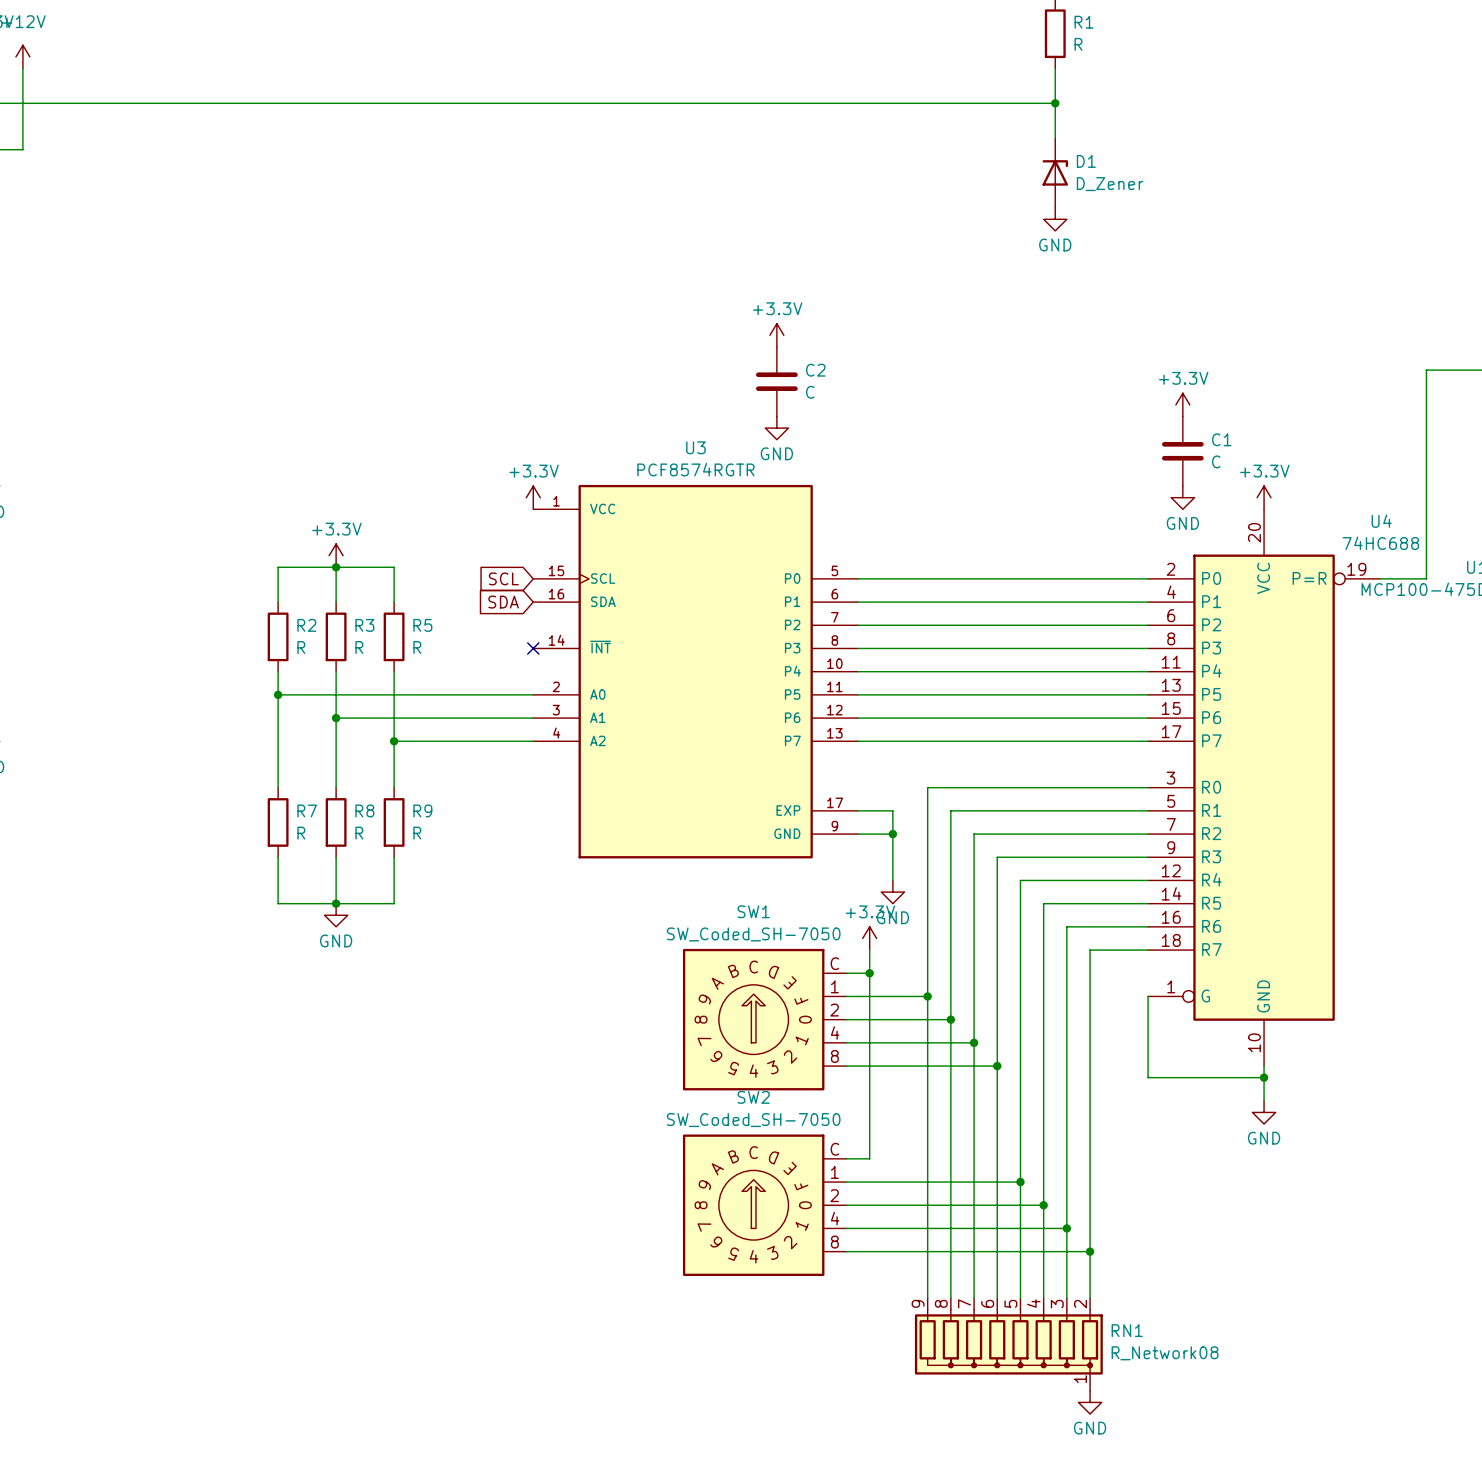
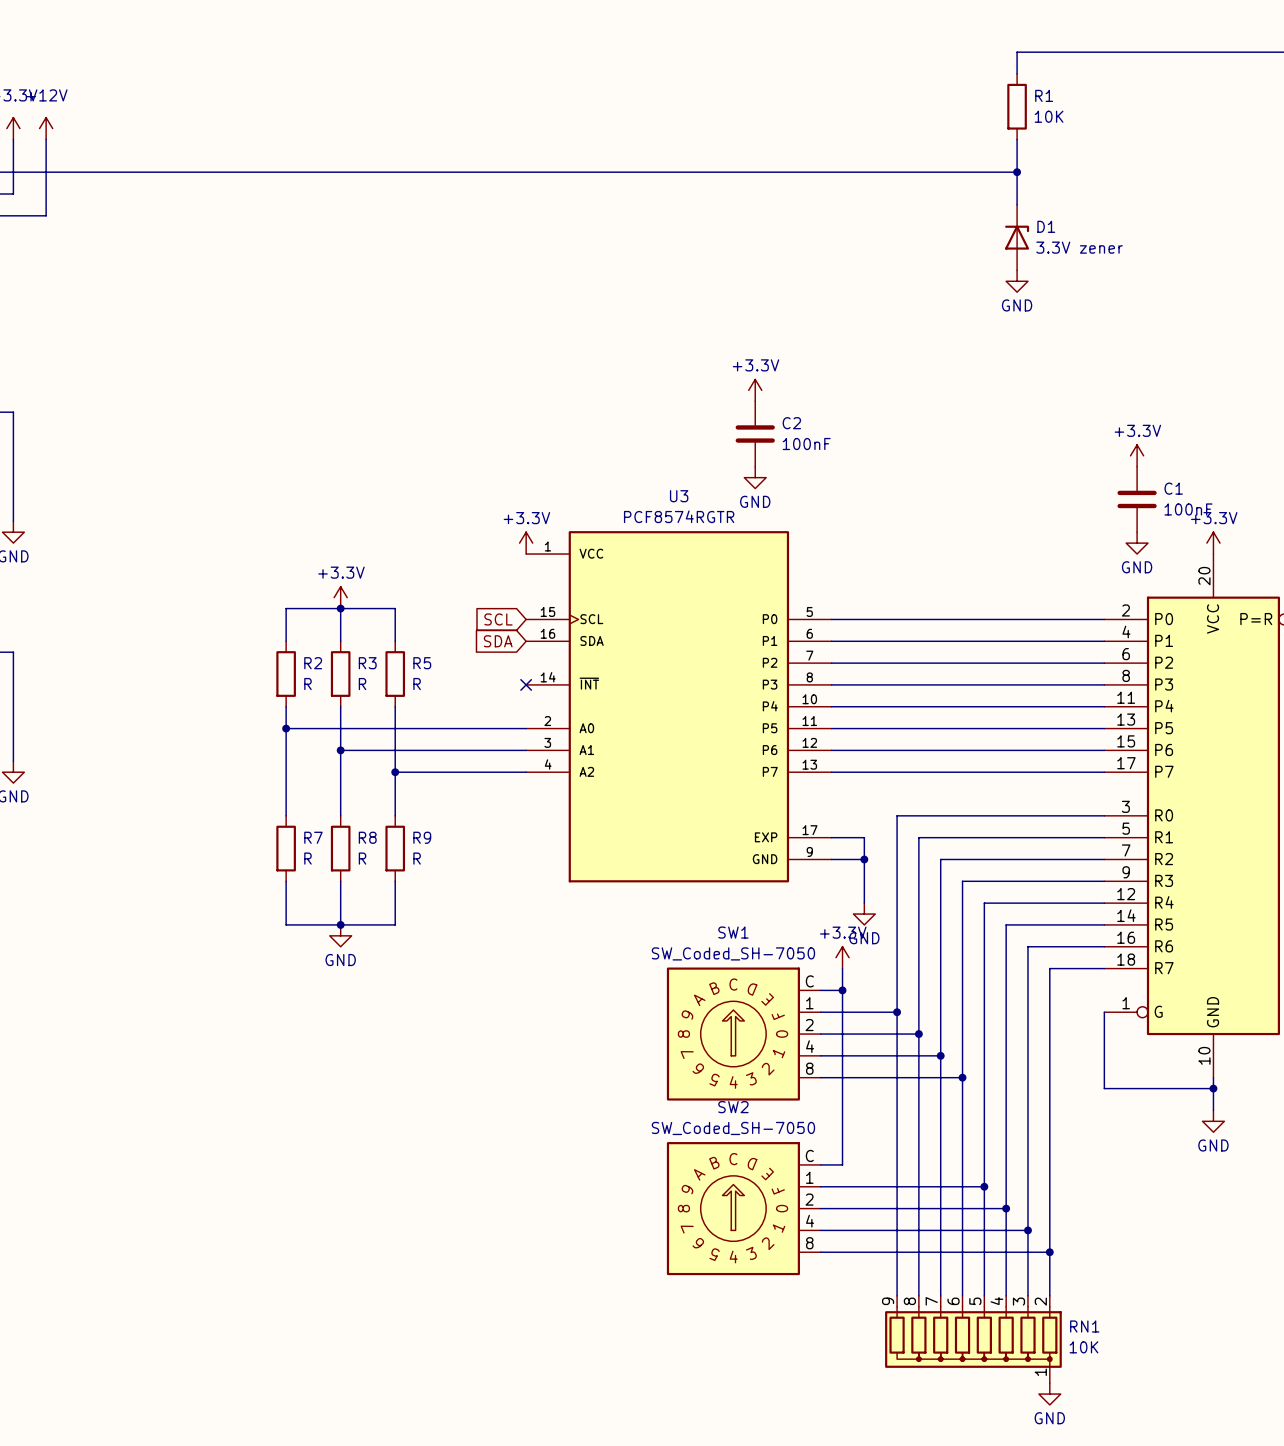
R1 value: R (1078, 44) -> 10K (1049, 116)
D1 value: D_Zener (1110, 184) -> 3.3V zener (1079, 247)
C2 value: C (810, 392) -> 100nF (806, 444)
C1 value: C (1216, 461) -> 100nF (1188, 509)
RN1 value: R_Network08 (1165, 1353) -> 10K (1083, 1347)

